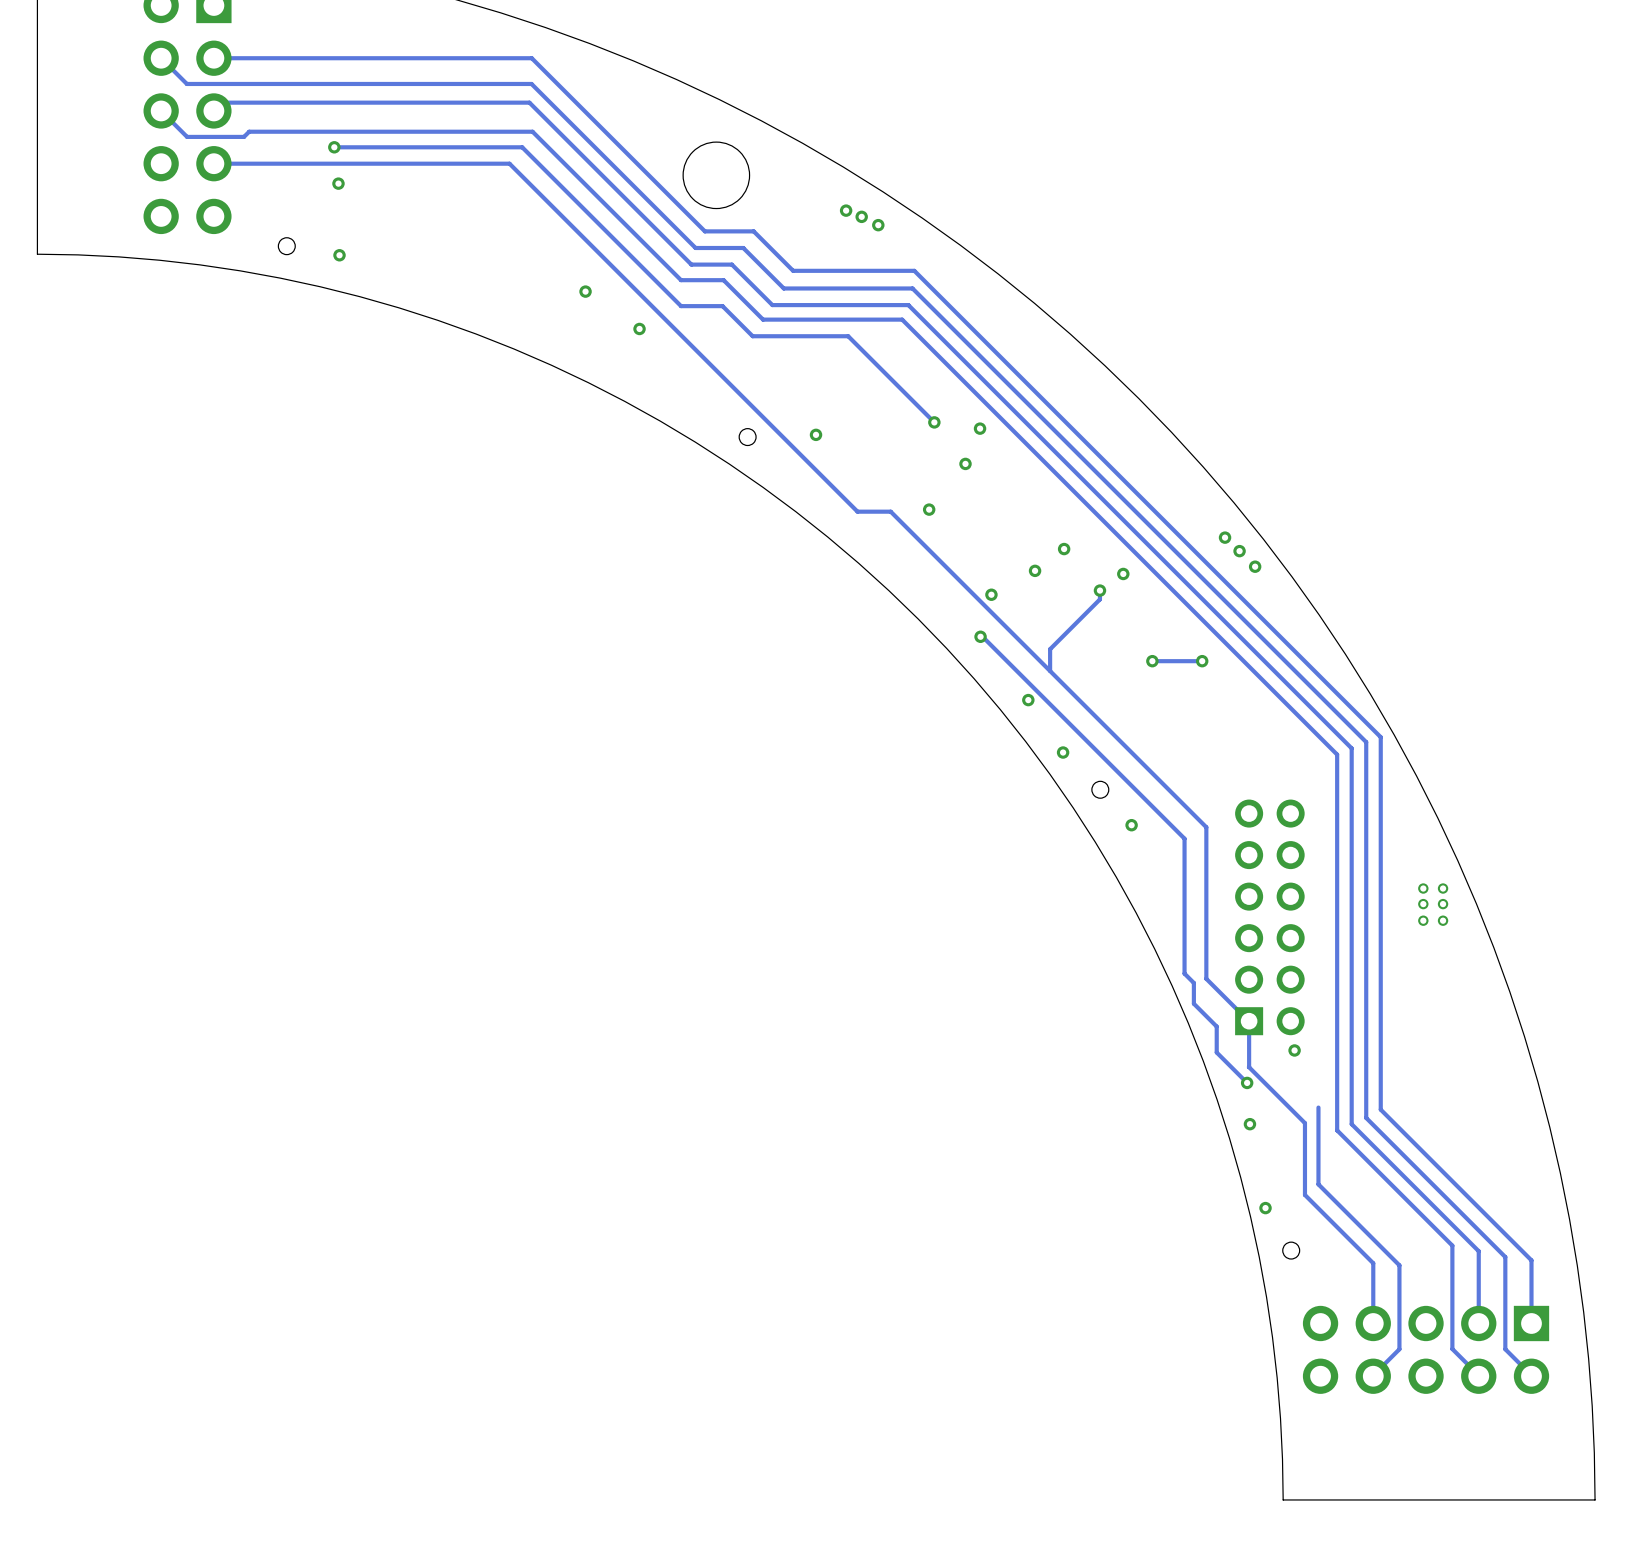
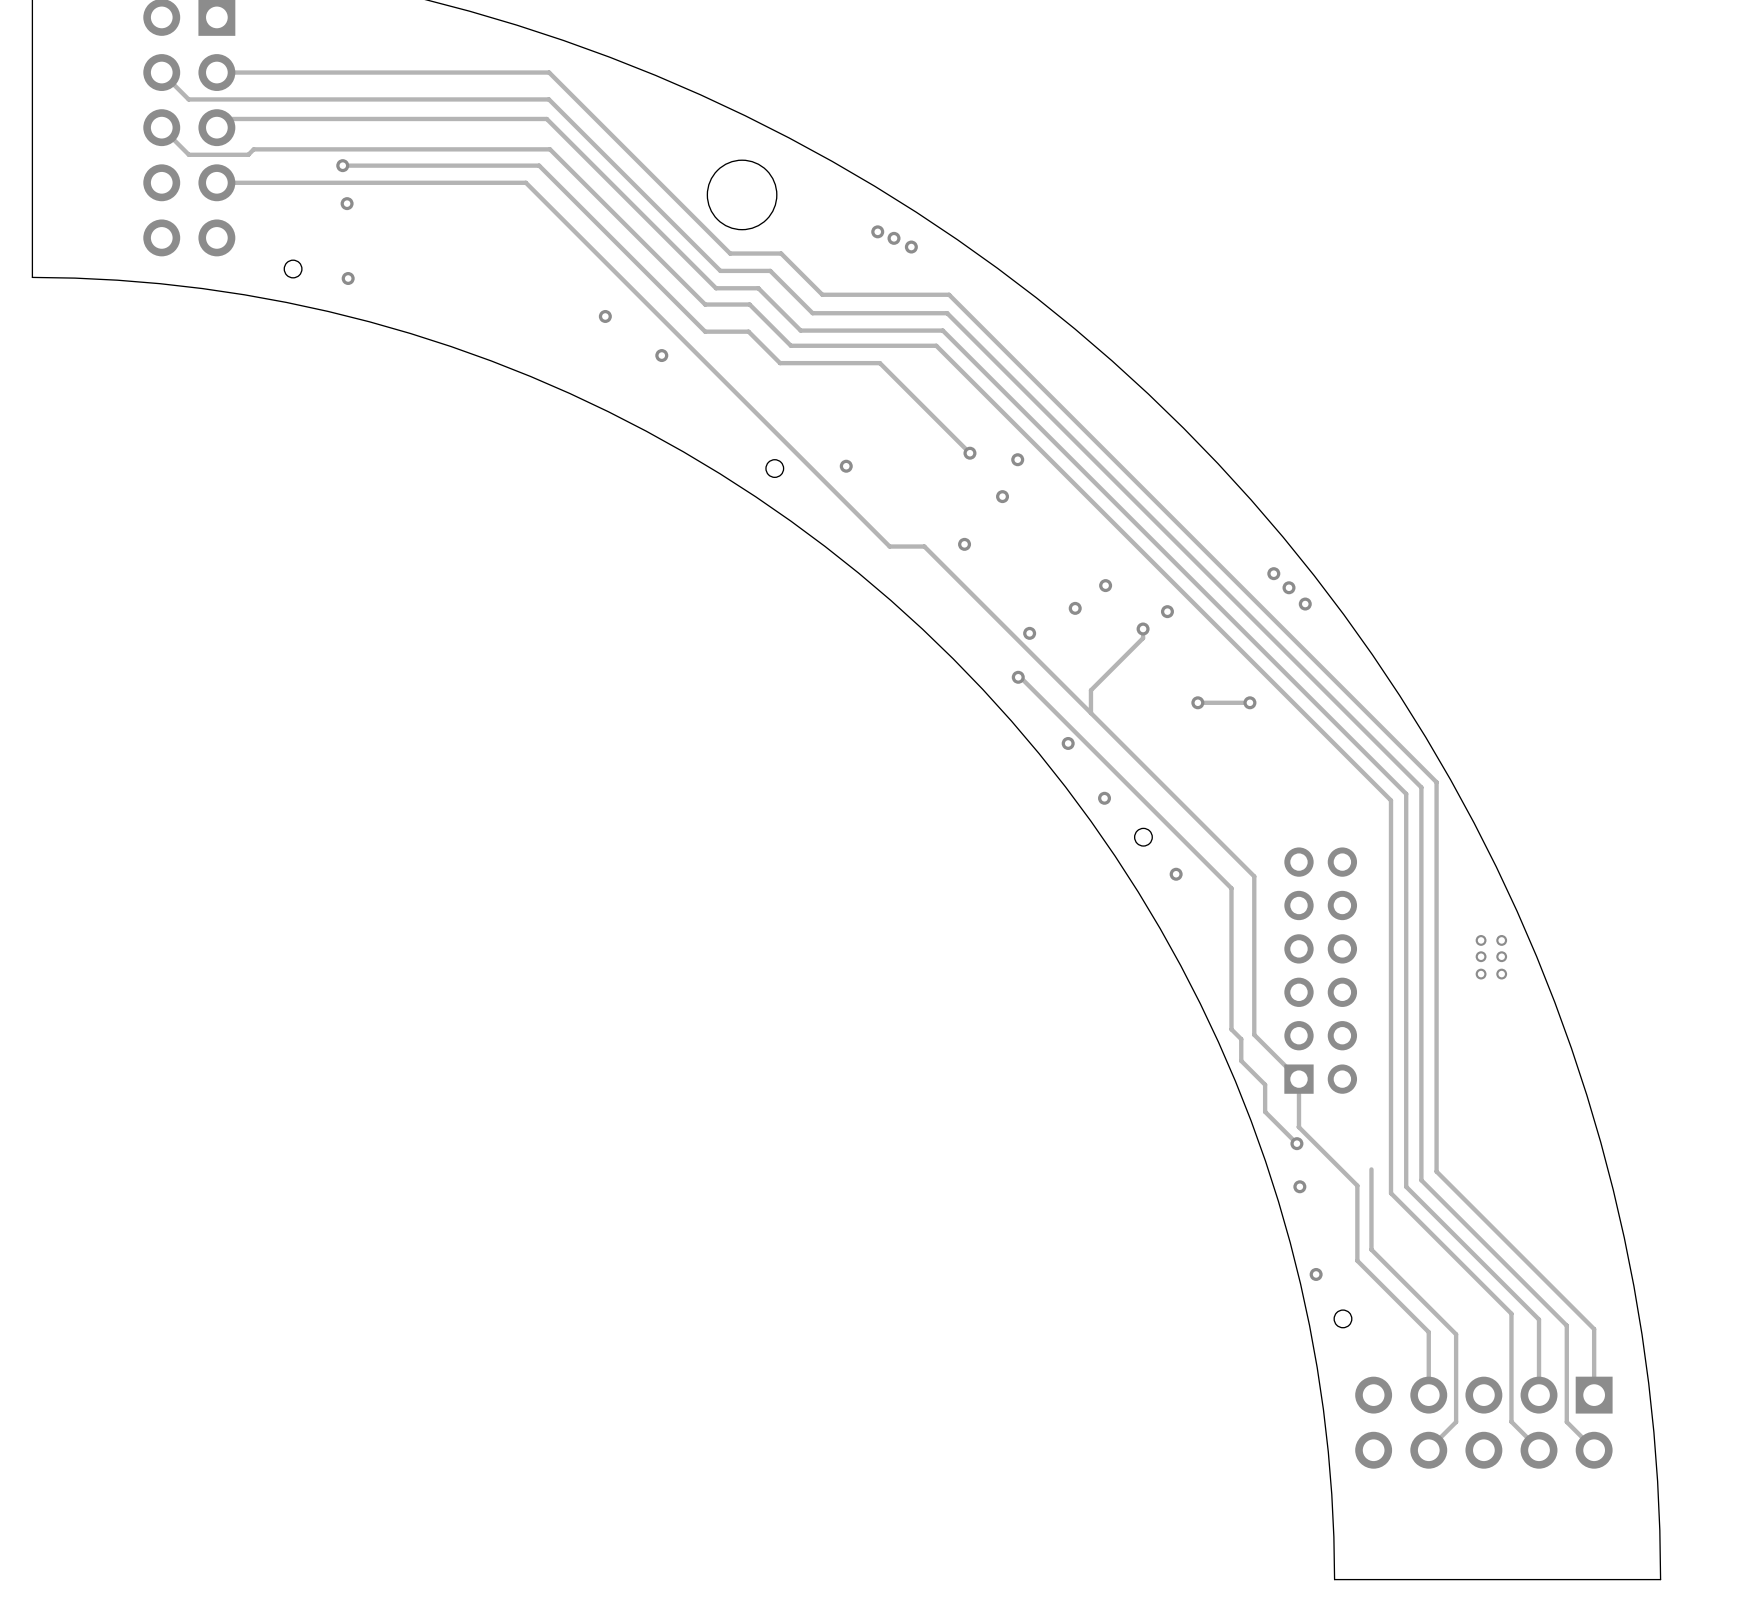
via: (1294, 1050) -> none

